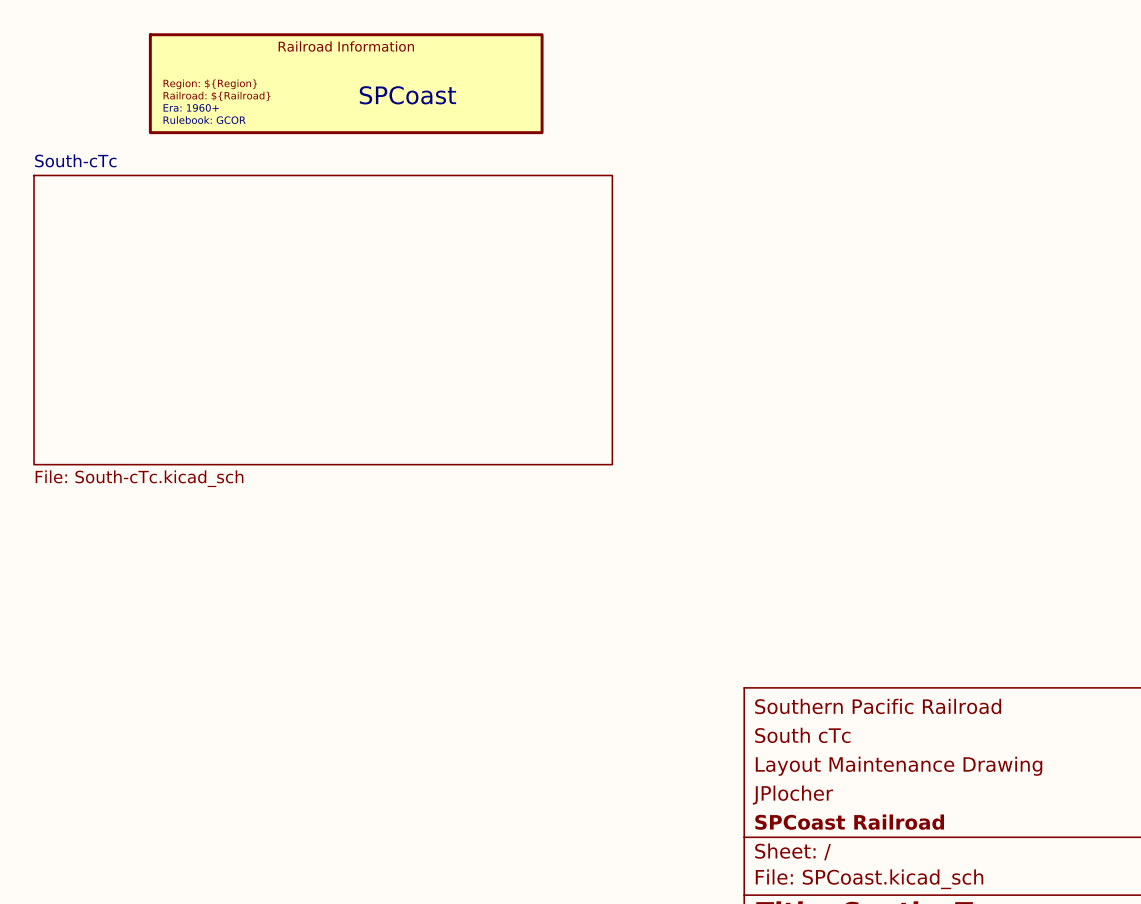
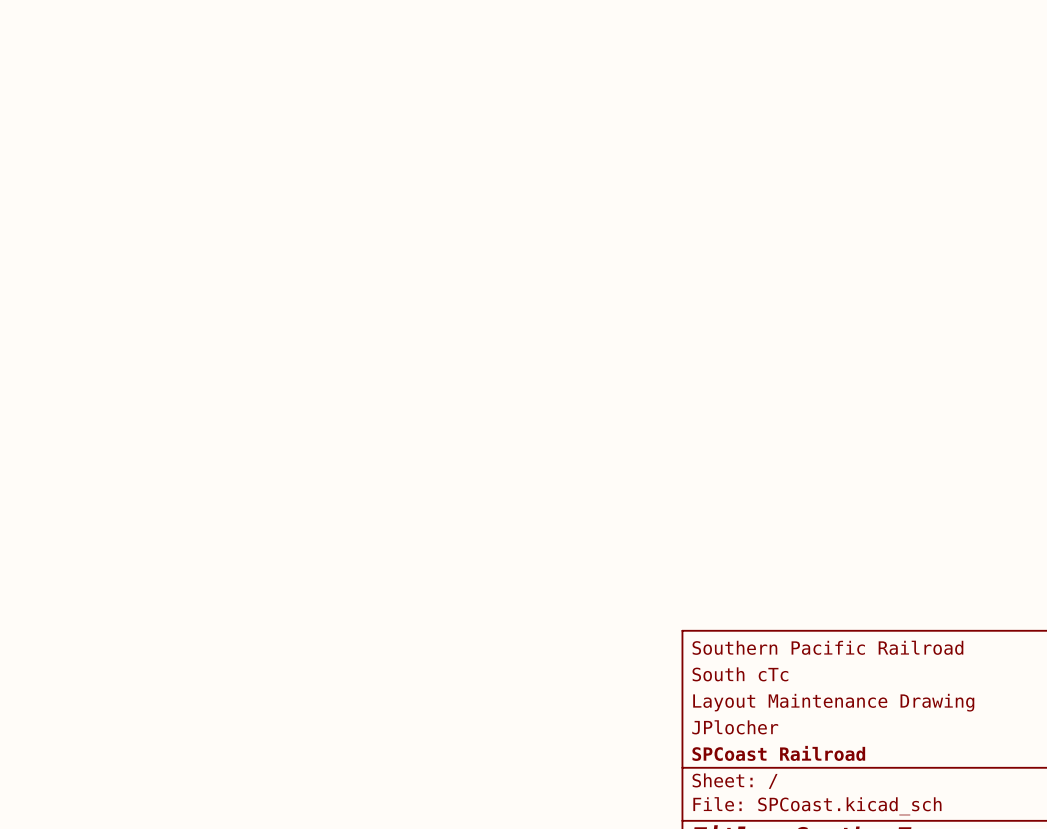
part: (346, 83) -> none
sheet South-cTc: File: South-cTc.kicad_sch (323, 320) -> none

